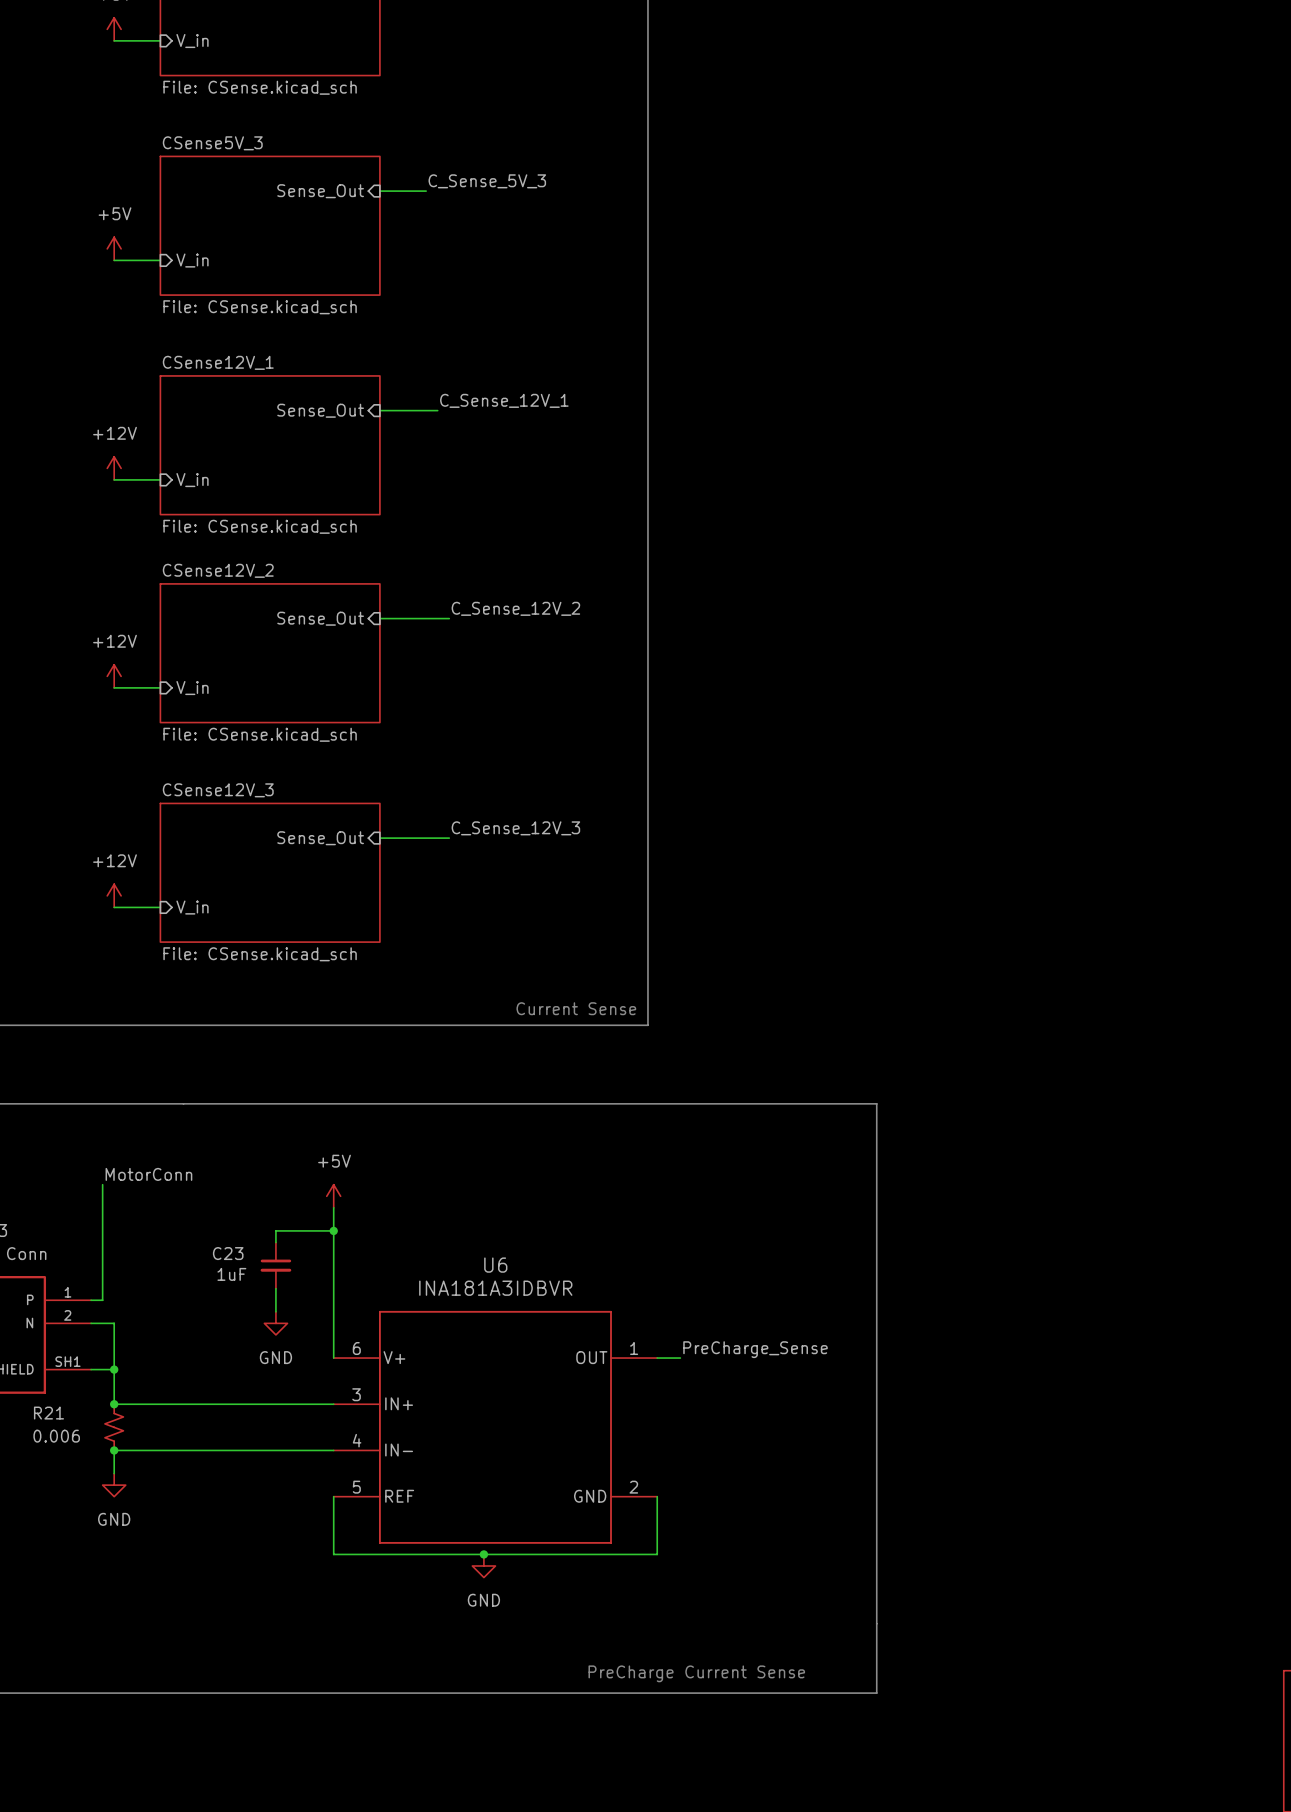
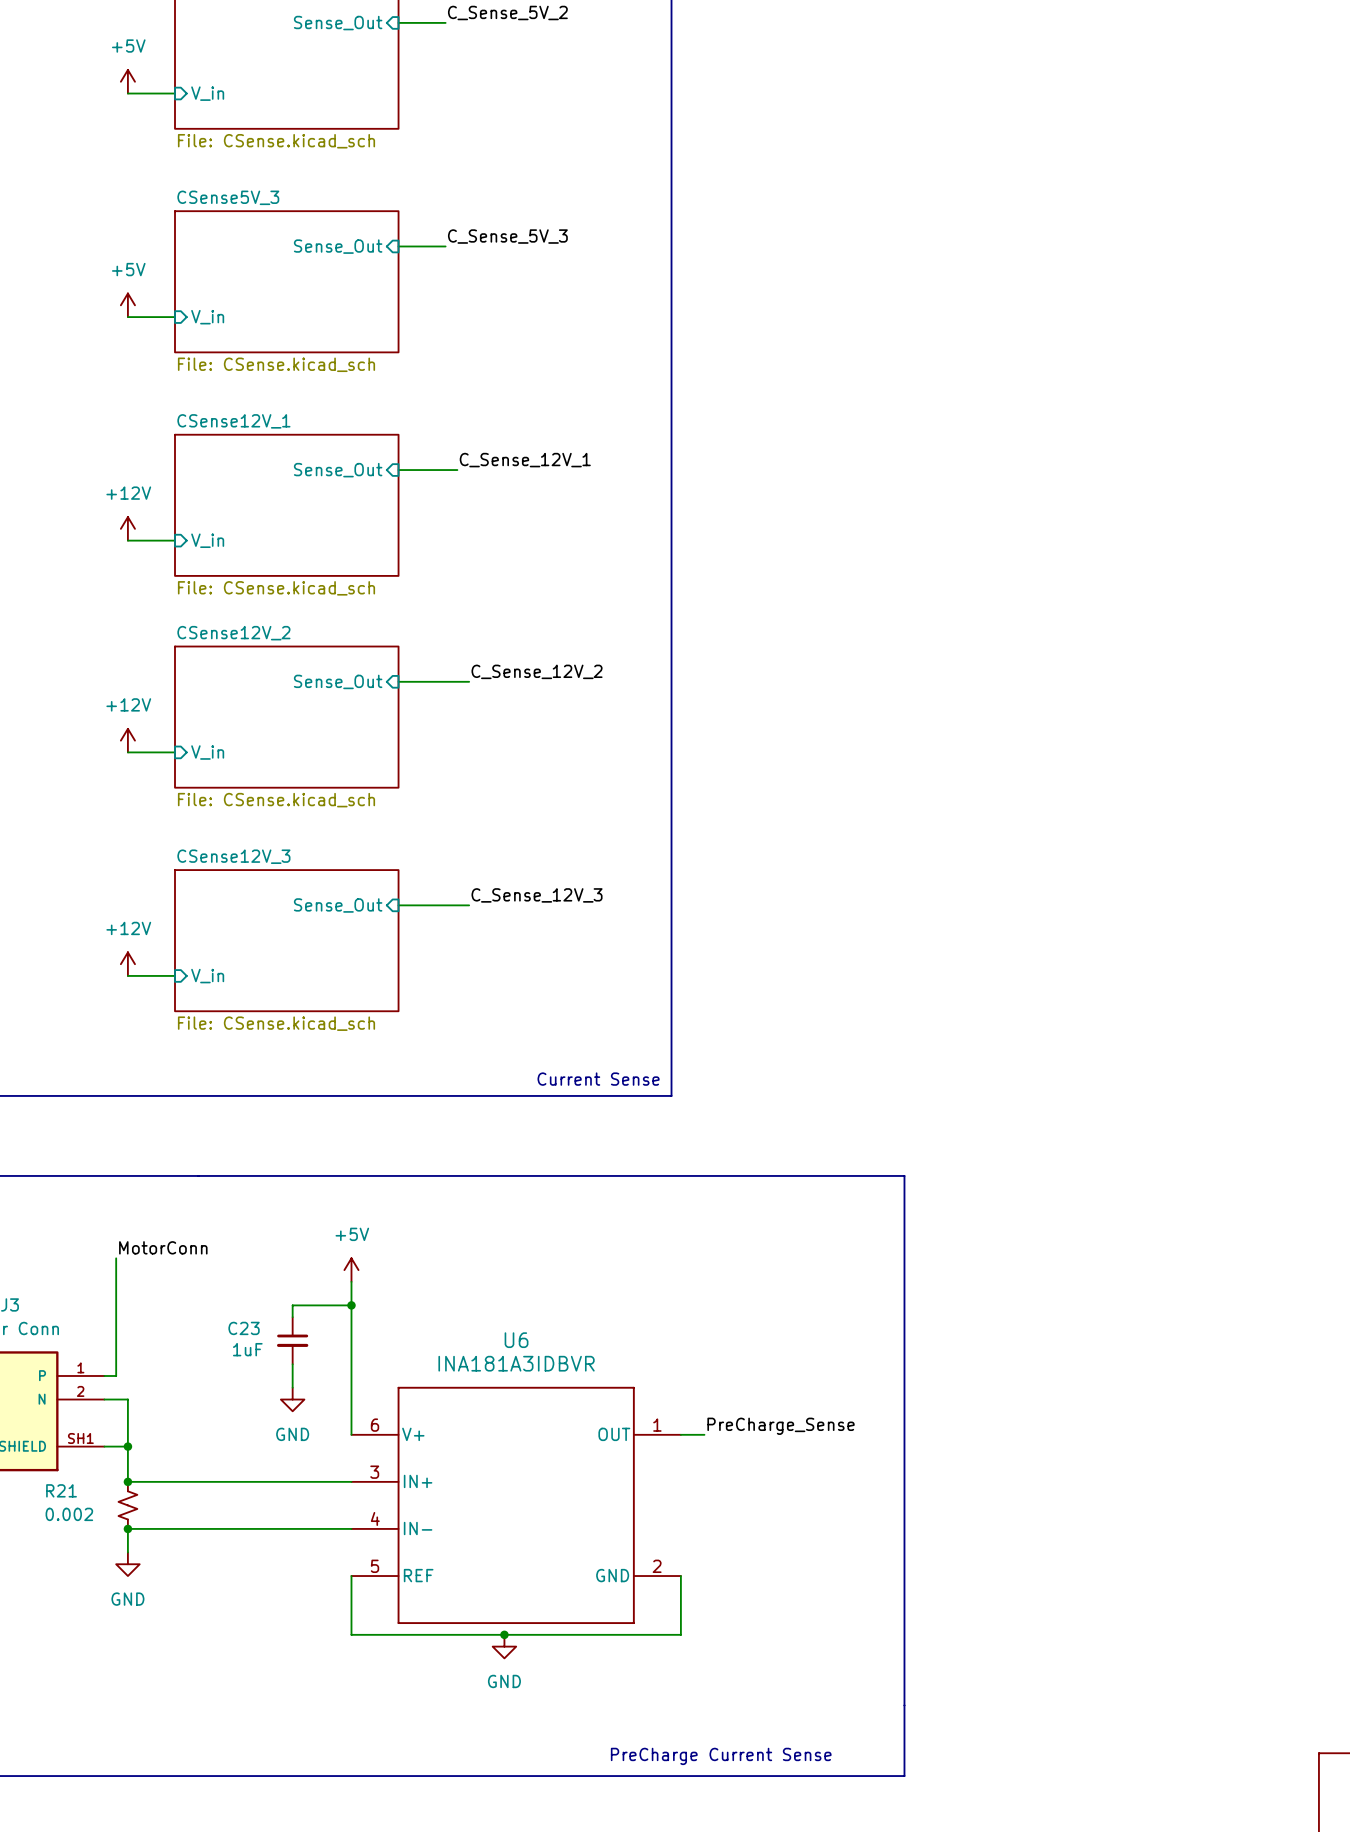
R21 value: 0.006 (56, 1436) -> 0.002 (69, 1514)

